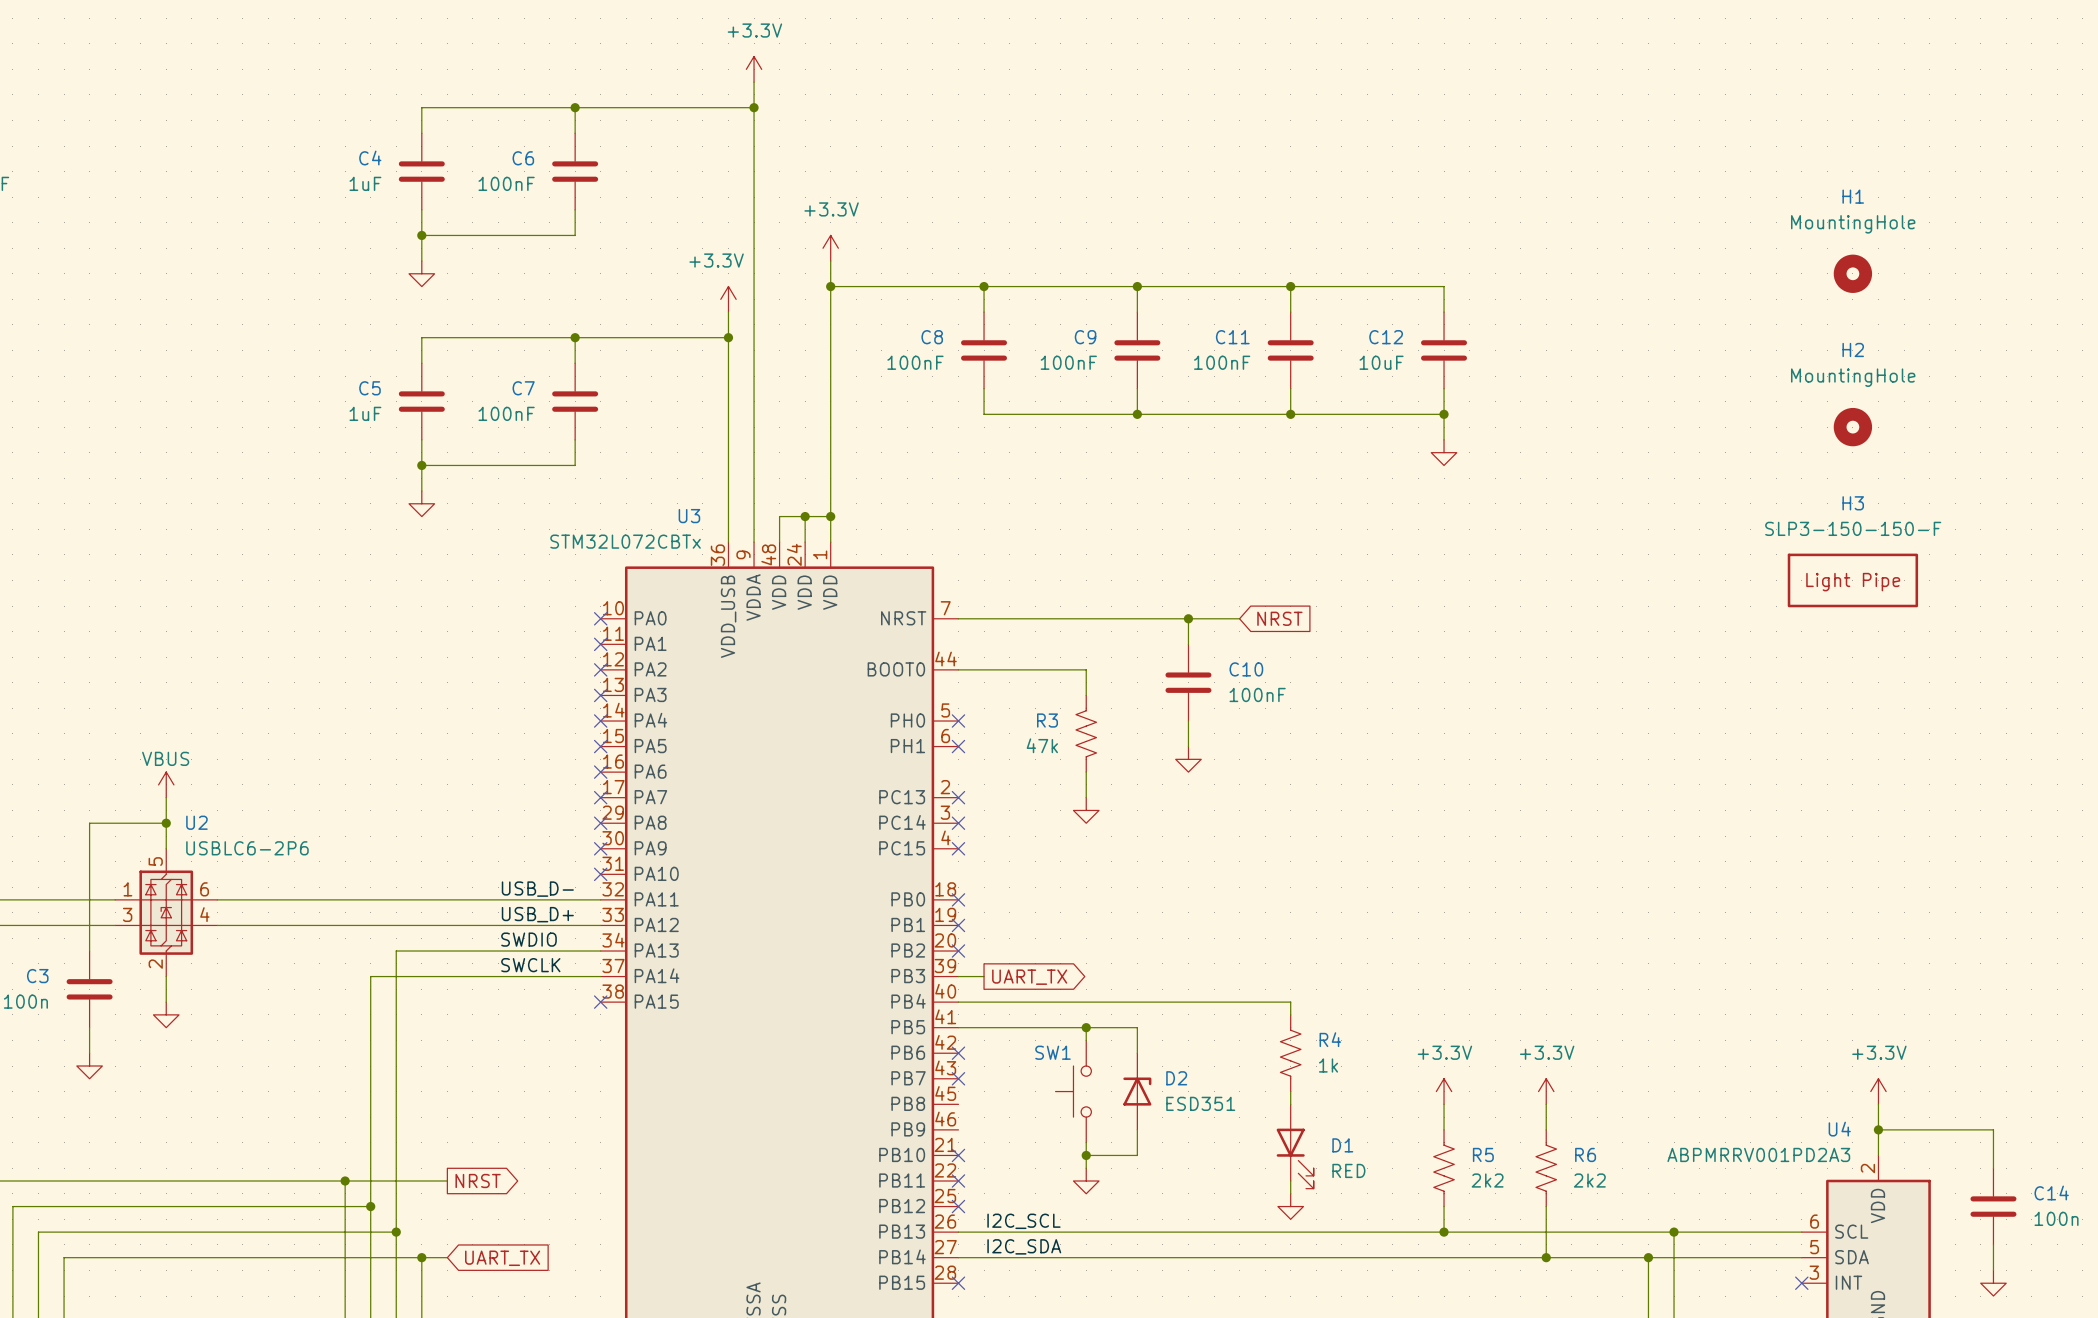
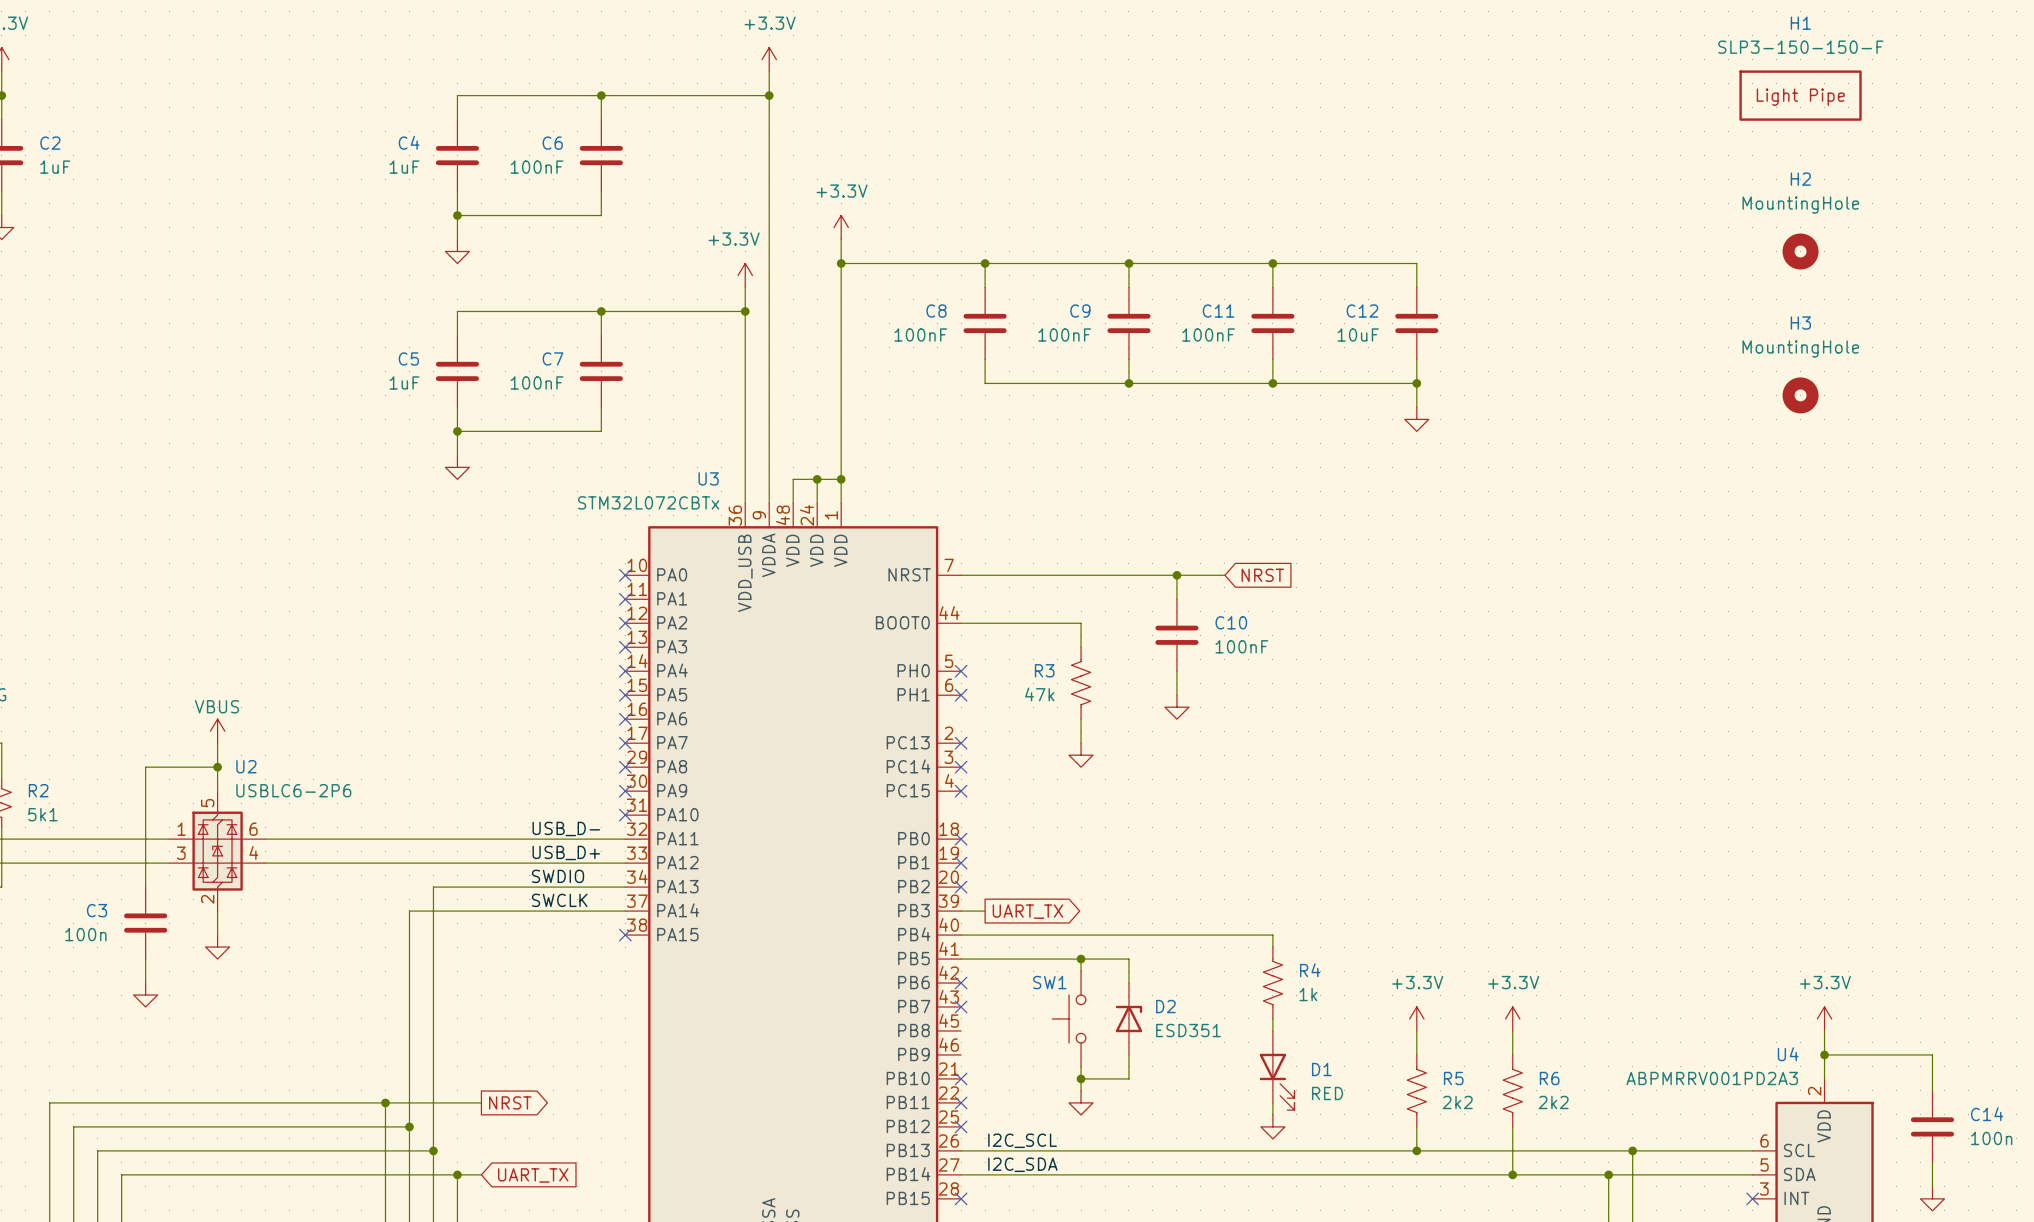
H1: none -> SLP3-150-150-F (1800, 95)
H1 name: H1 (1853, 196) -> H2 (1800, 179)
H2 name: H2 (1853, 349) -> H3 (1800, 323)
H3: SLP3-150-150-F (1852, 580) -> none

